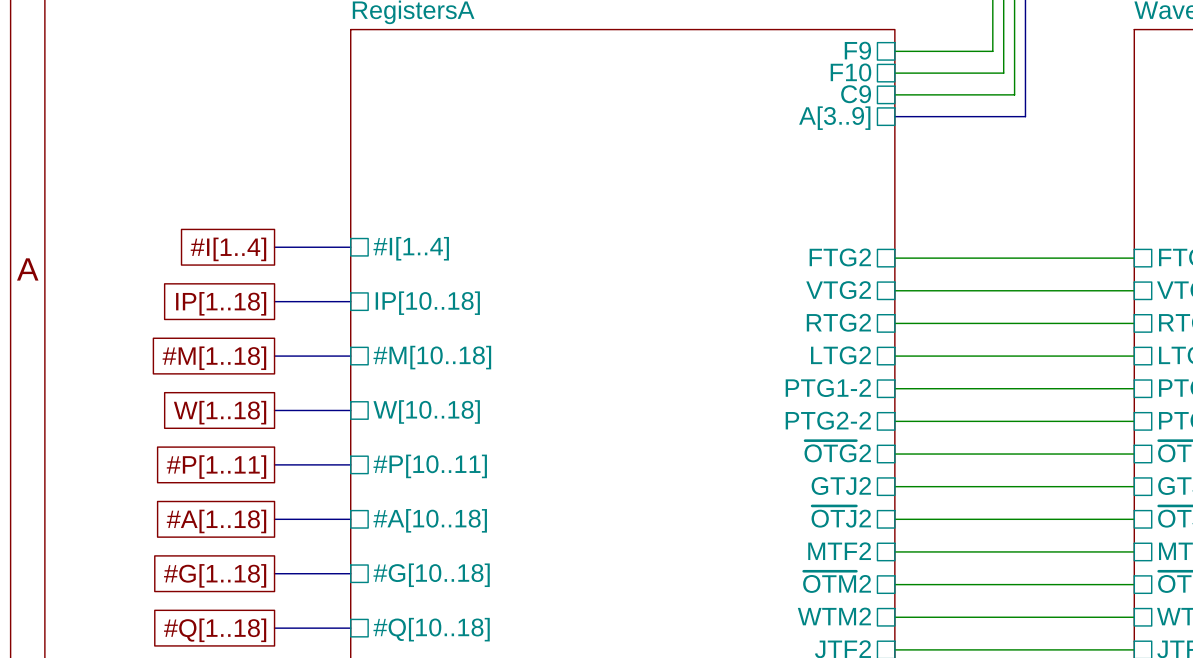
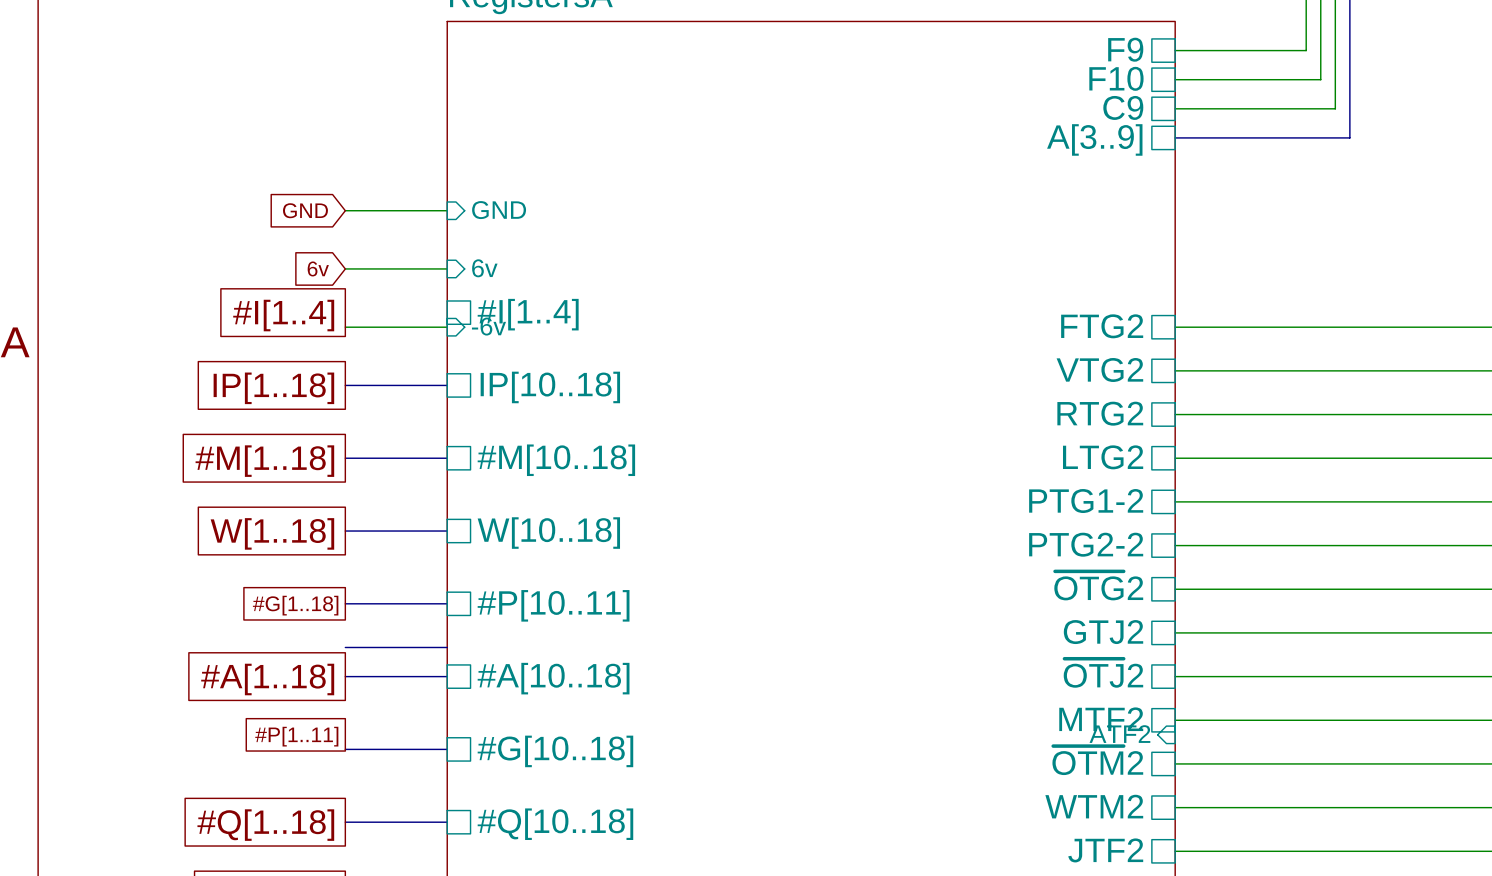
sheet pin: none -> GND (499, 210)
global label: none -> GND (305, 210)
wire: none -> (345, 210) (447, 210)
global label: none -> 6v (318, 268)
wire: none -> (345, 268) (447, 268)
sheet pin: none -> 6v (484, 268)
bus: (274, 247) (350, 247) -> (345, 647) (447, 647)
sheet pin: none -> -6v (488, 326)
wire: none -> (345, 327) (447, 327)
global label: #P[1..11] (216, 467) -> #G[1..18] (295, 605)
sheet pin: none -> ATF2 (1119, 734)
global label: #G[1..18] (215, 575) -> #P[1..11] (296, 736)

